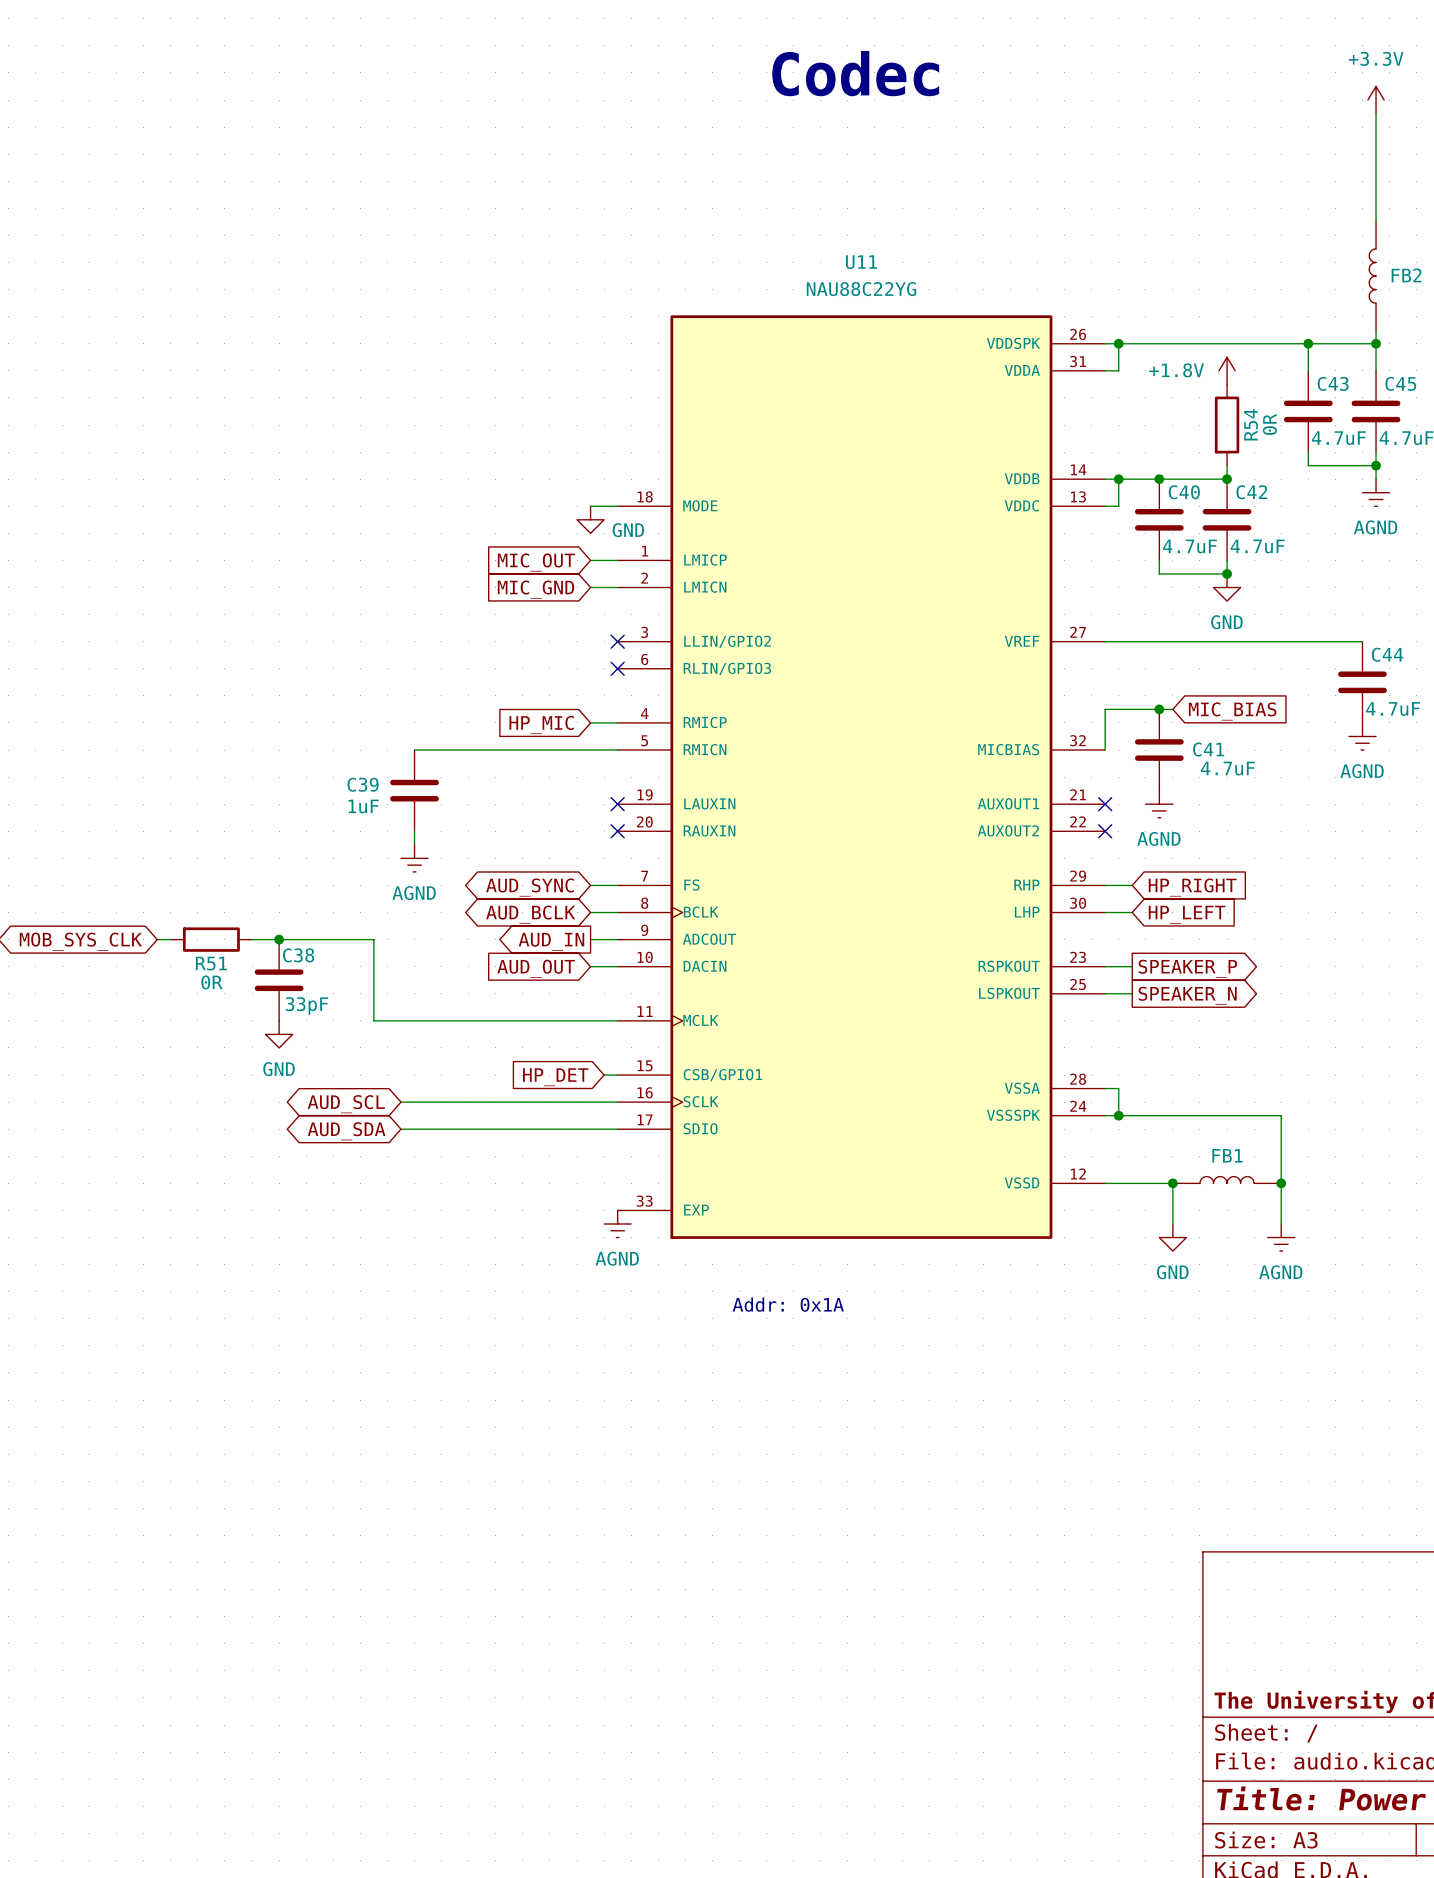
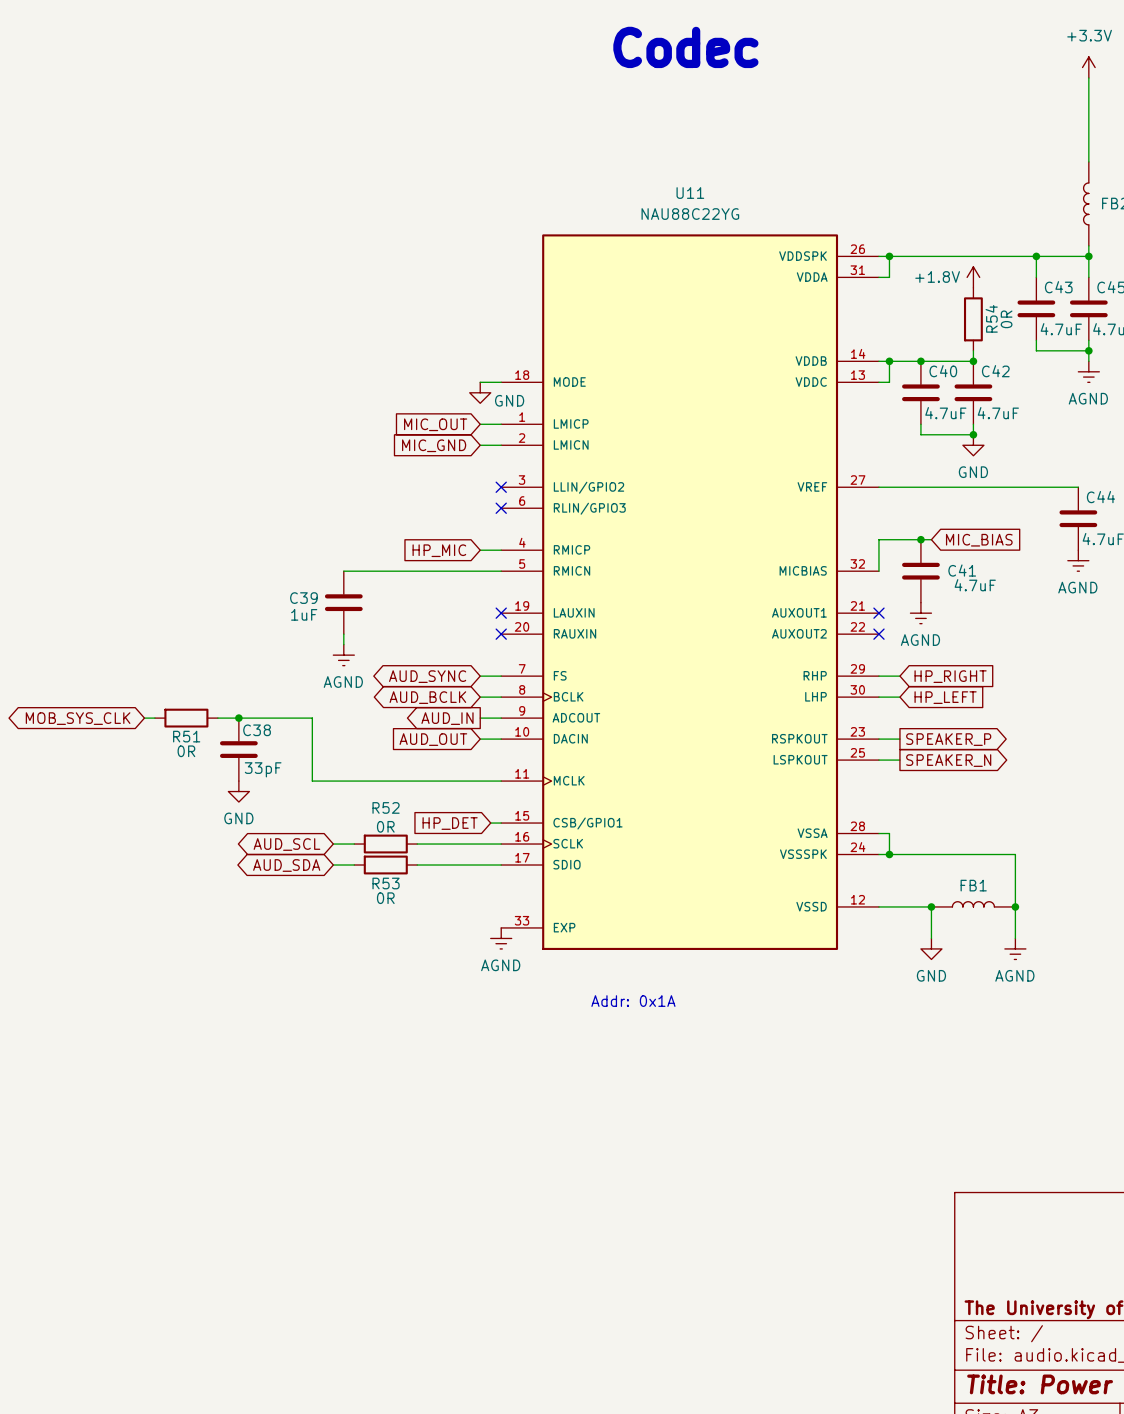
wire: (428, 1102) (509, 1102) -> none
R52: none -> 0R (385, 844)
wire: (428, 1129) (509, 1129) -> none
R53: none -> 0R (385, 865)

